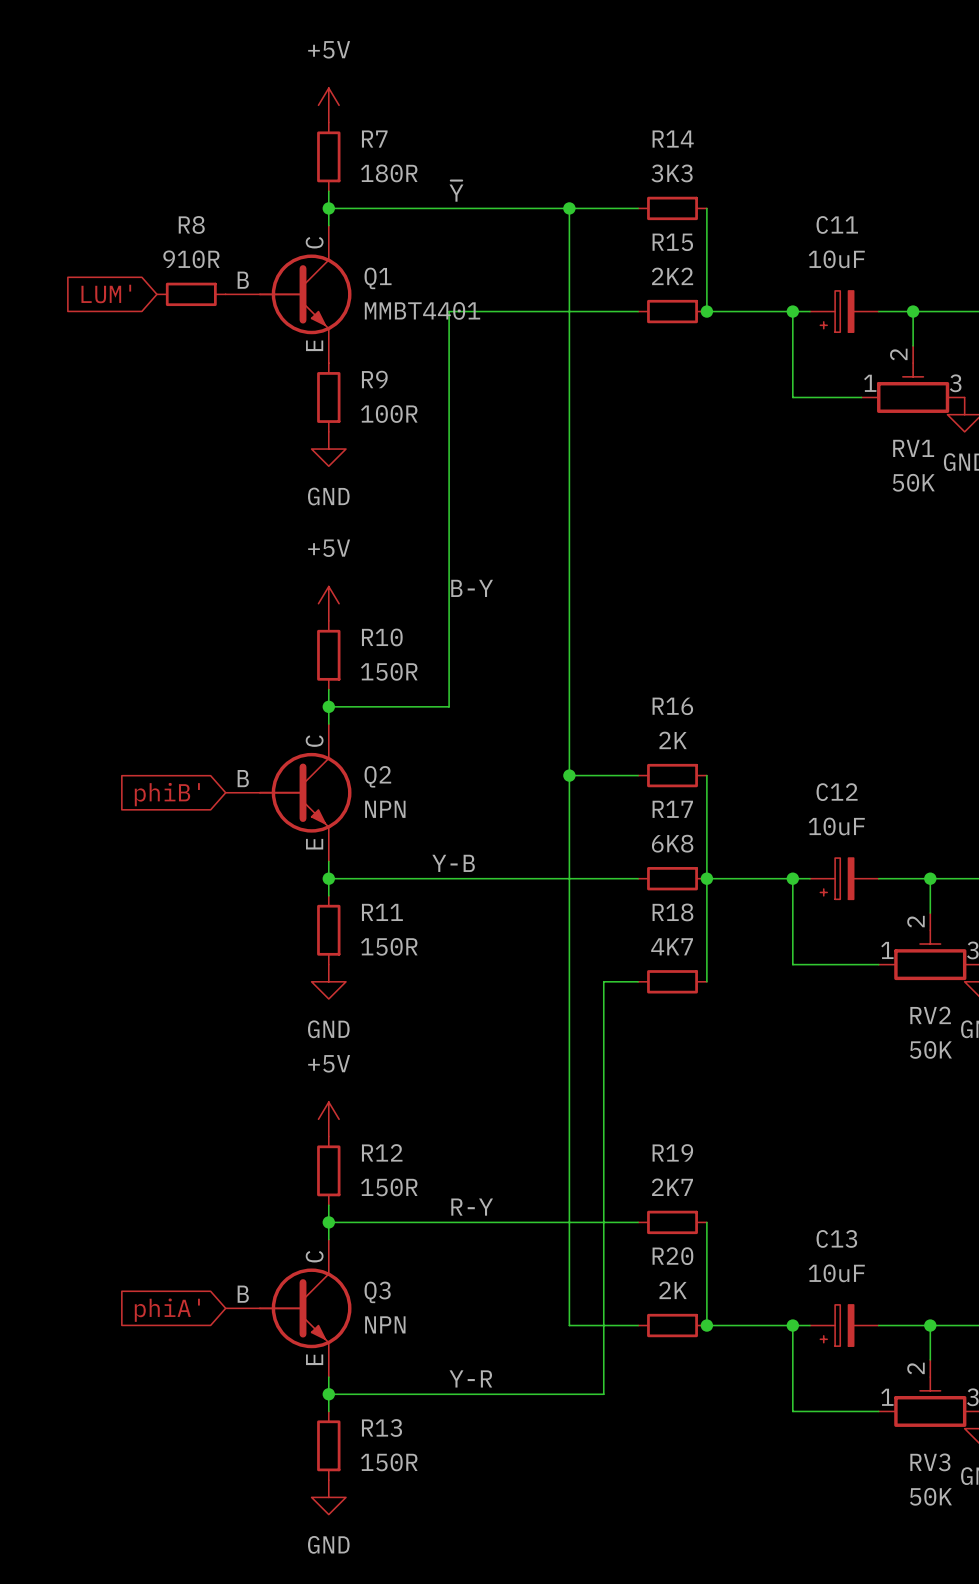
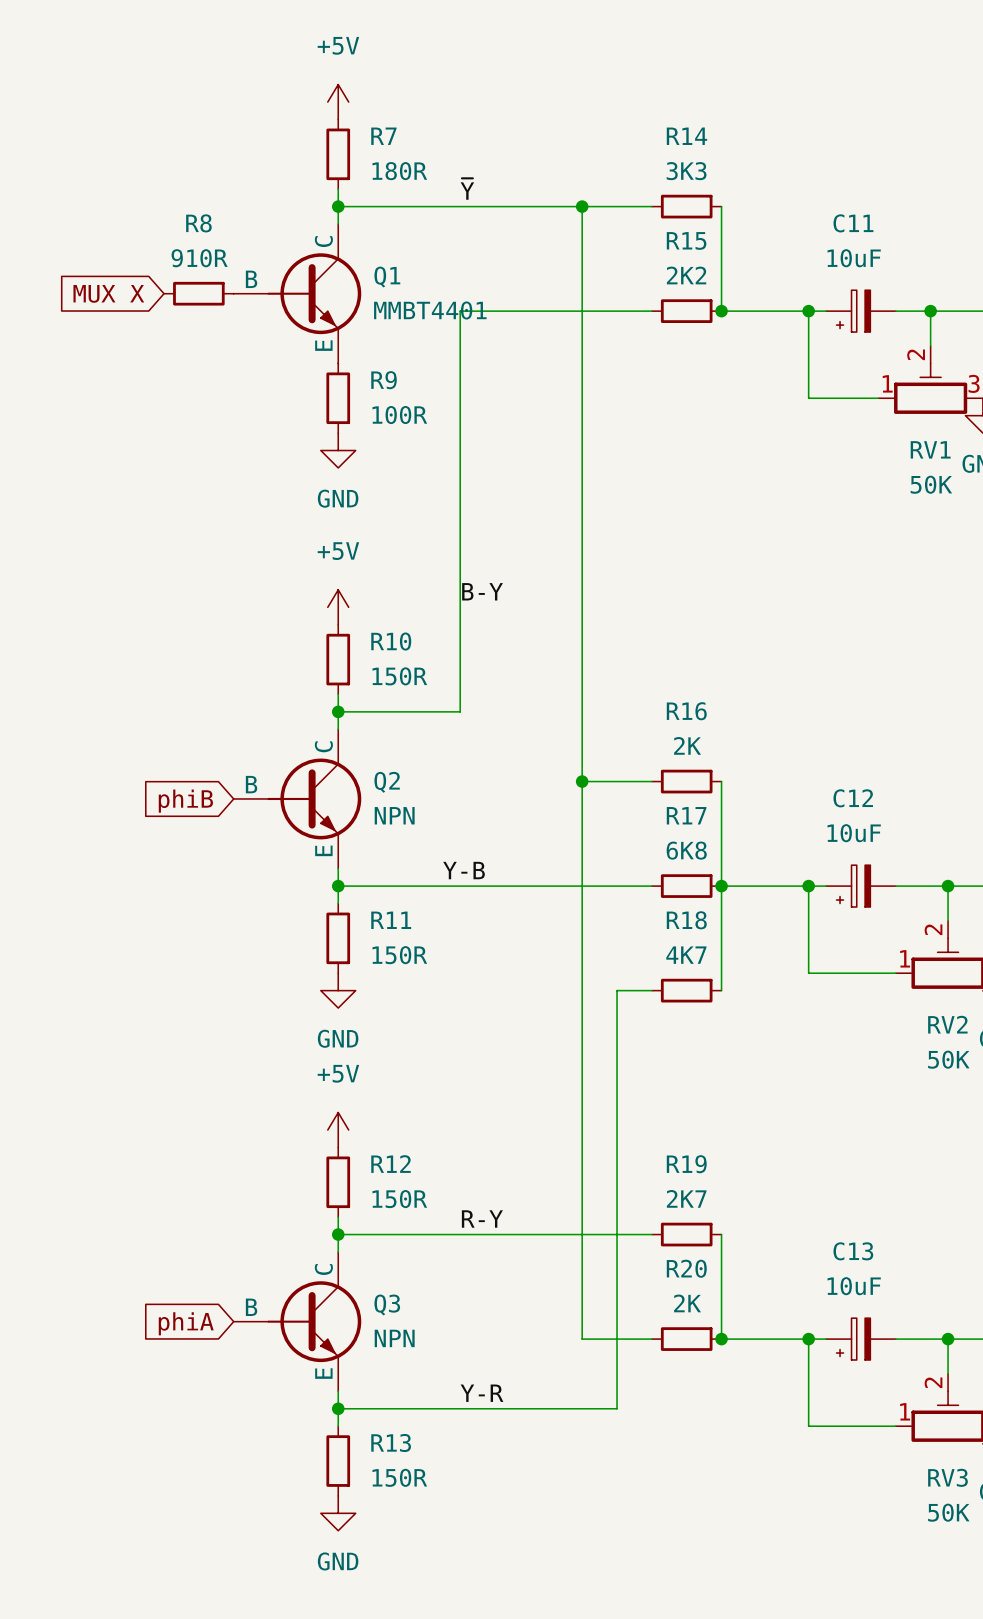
global label: LUM' (106, 293) -> MUX X (108, 293)
global label: phiB' (167, 794) -> phiB (185, 801)
global label: phiA' (167, 1310) -> phiA (186, 1323)

